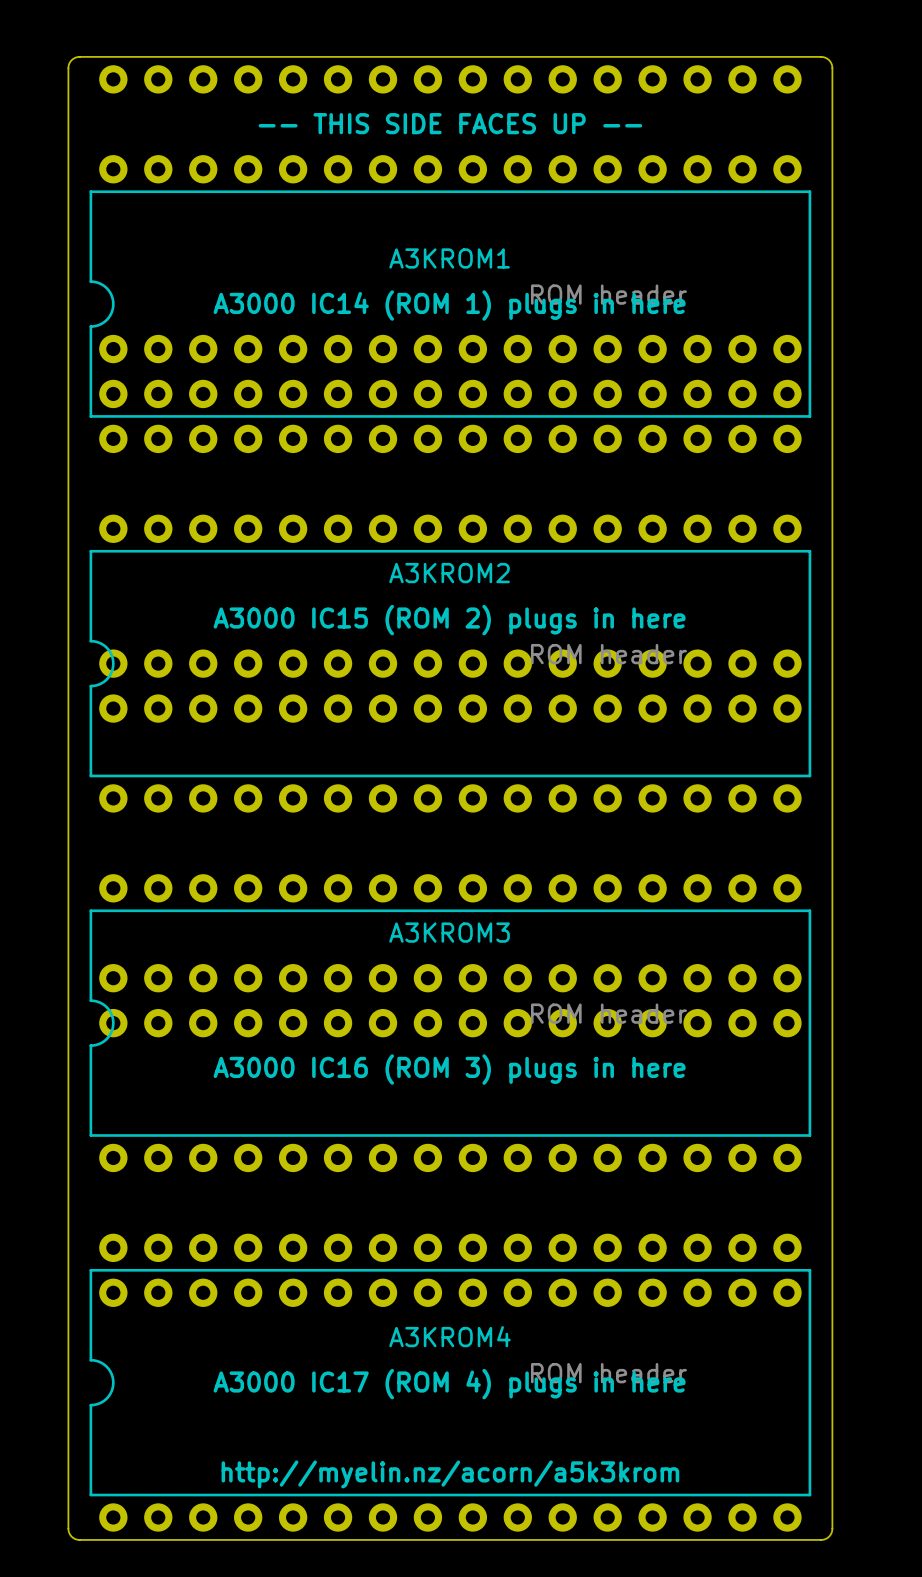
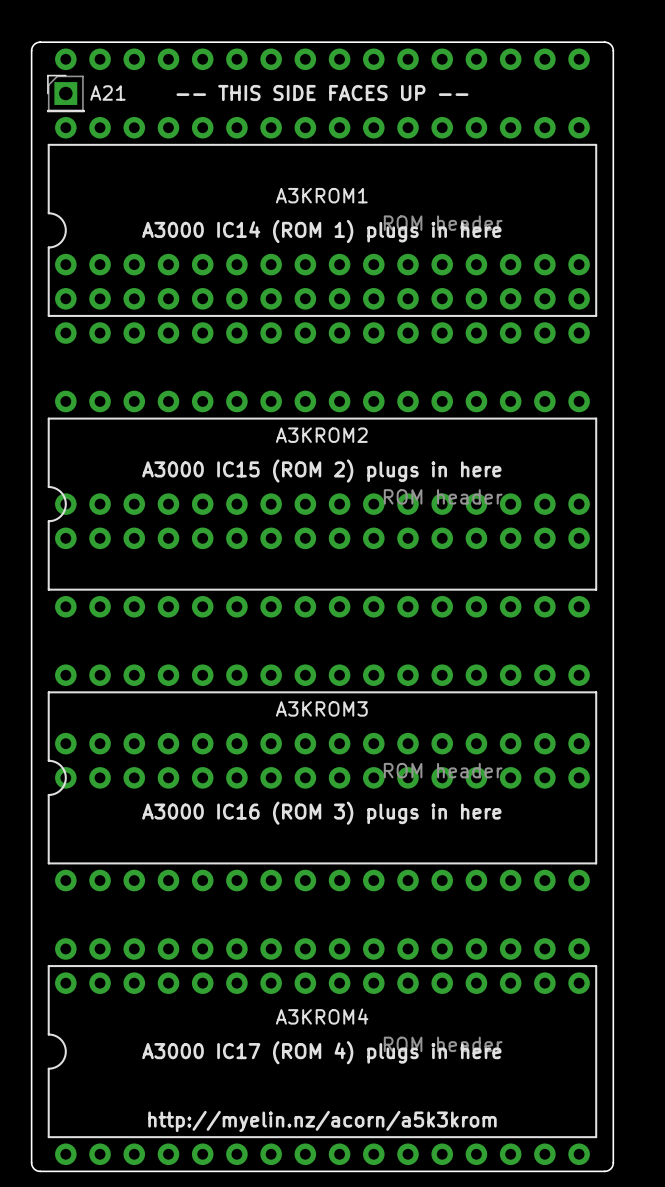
A21: none -> (65, 93)

